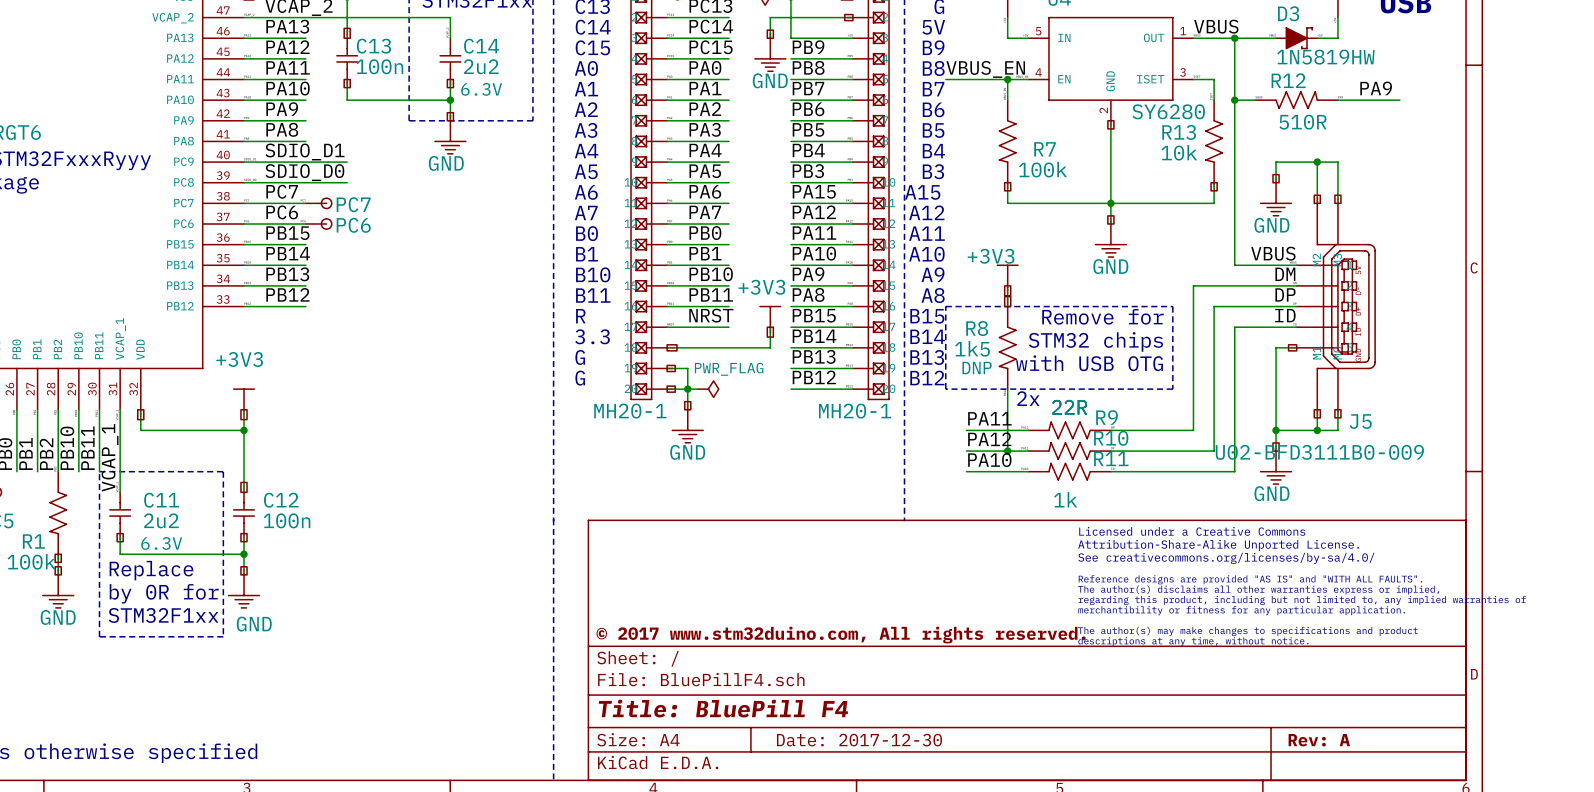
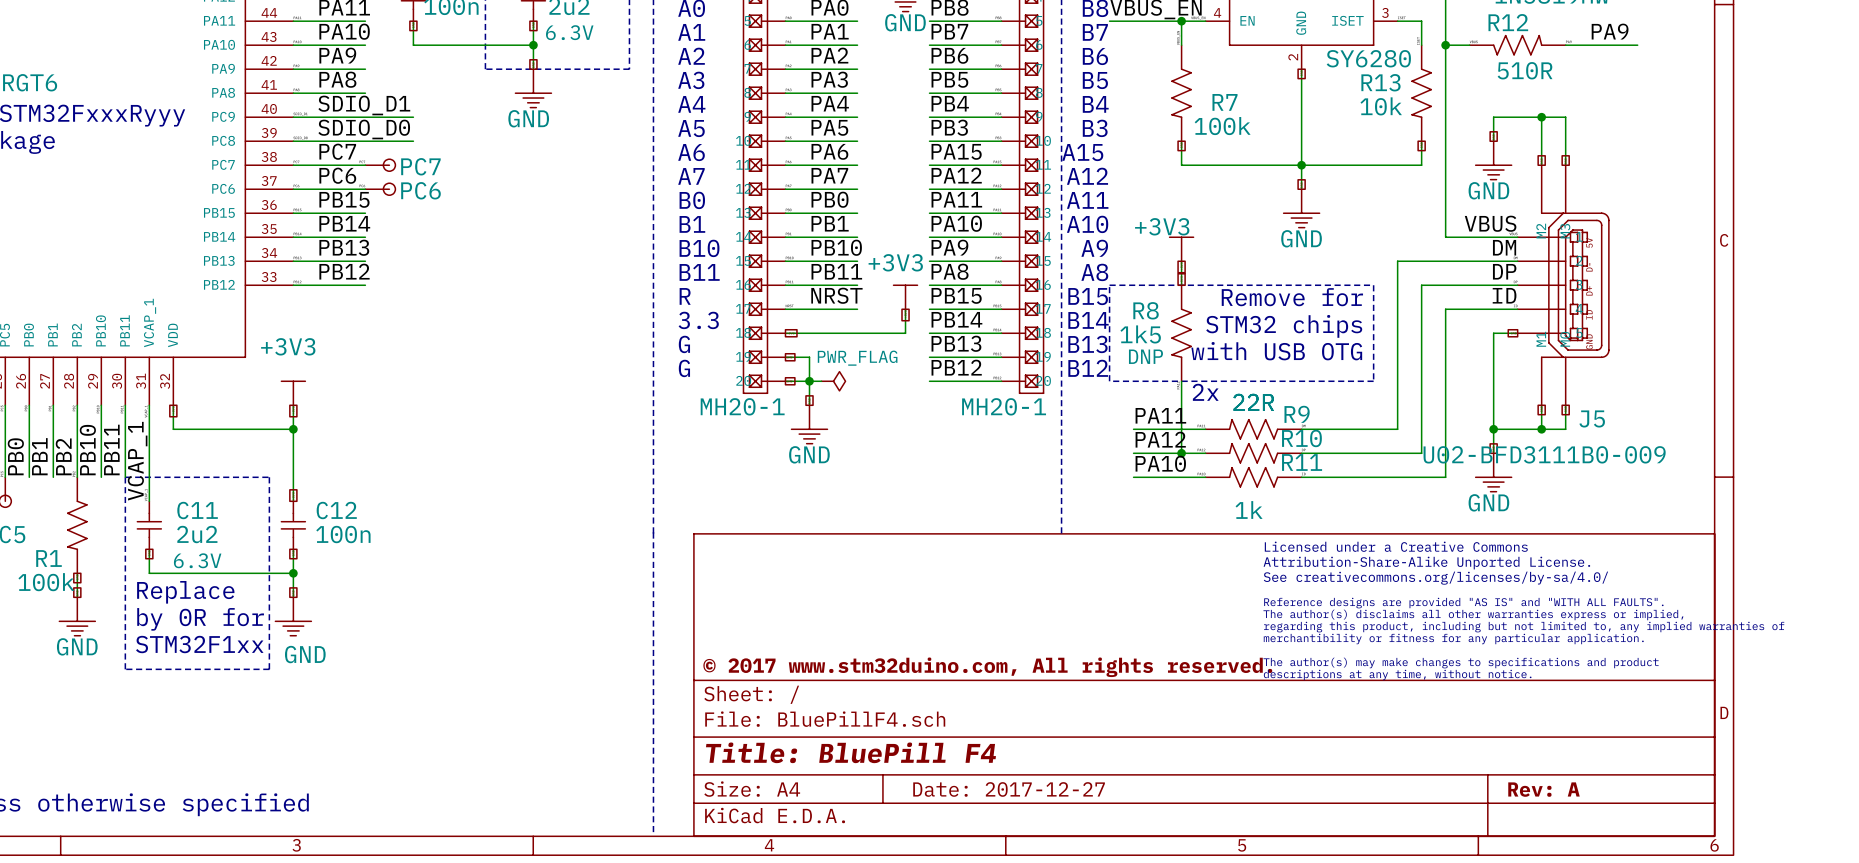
title block: Date: 2017-12-30 (859, 740) -> Date: 2017-12-27 (1009, 789)

